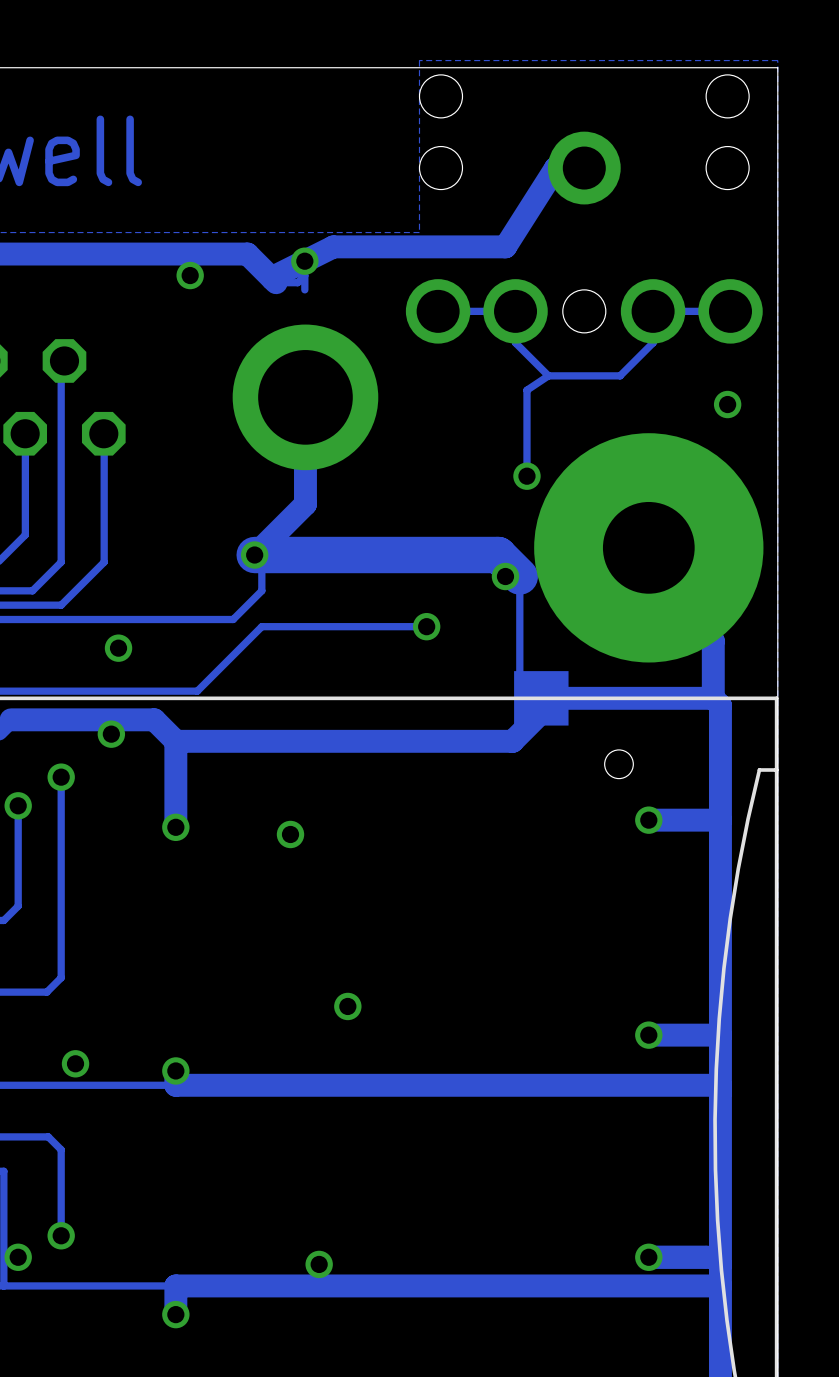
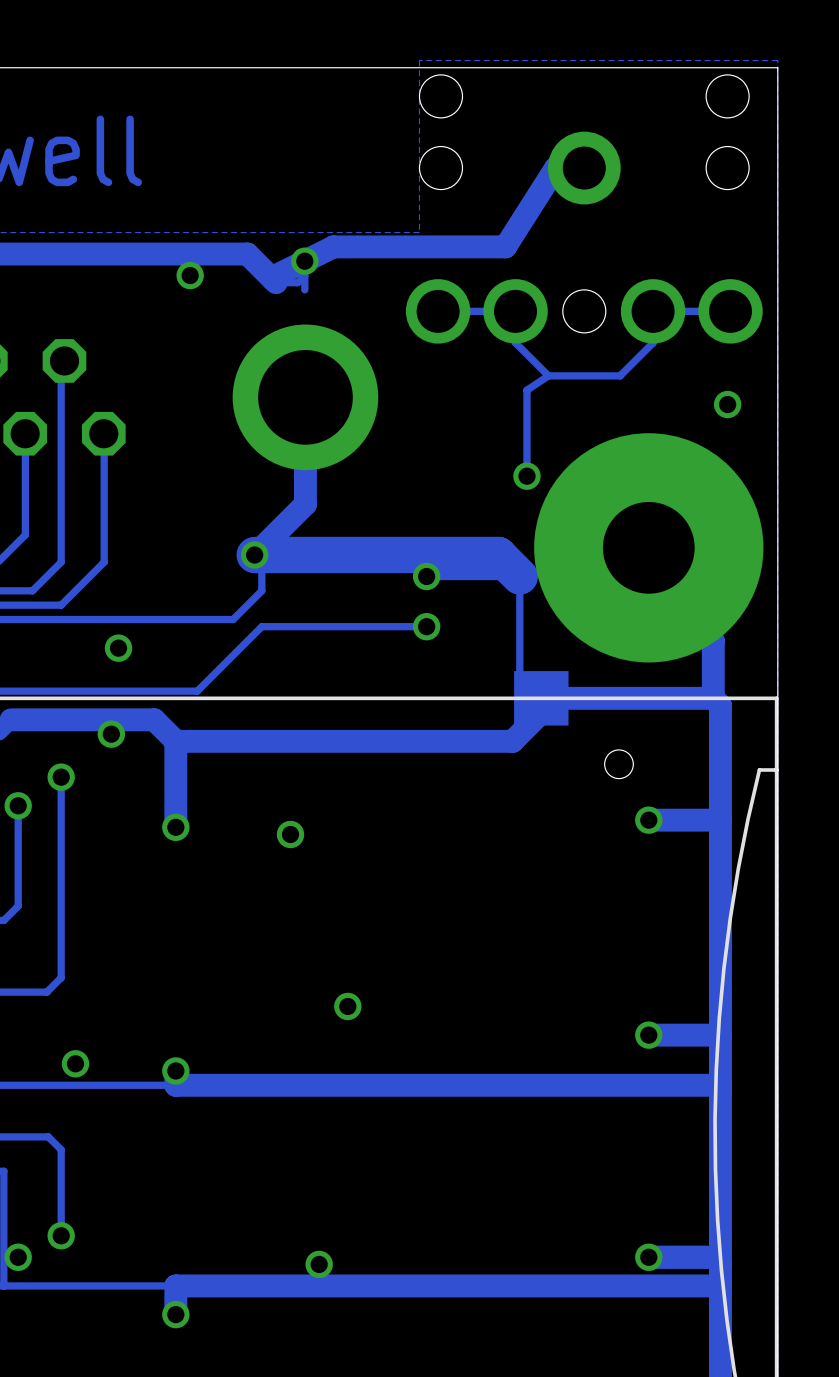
track: none -> (505, 576) (426, 576)
via position: (505, 576) -> (426, 576)

